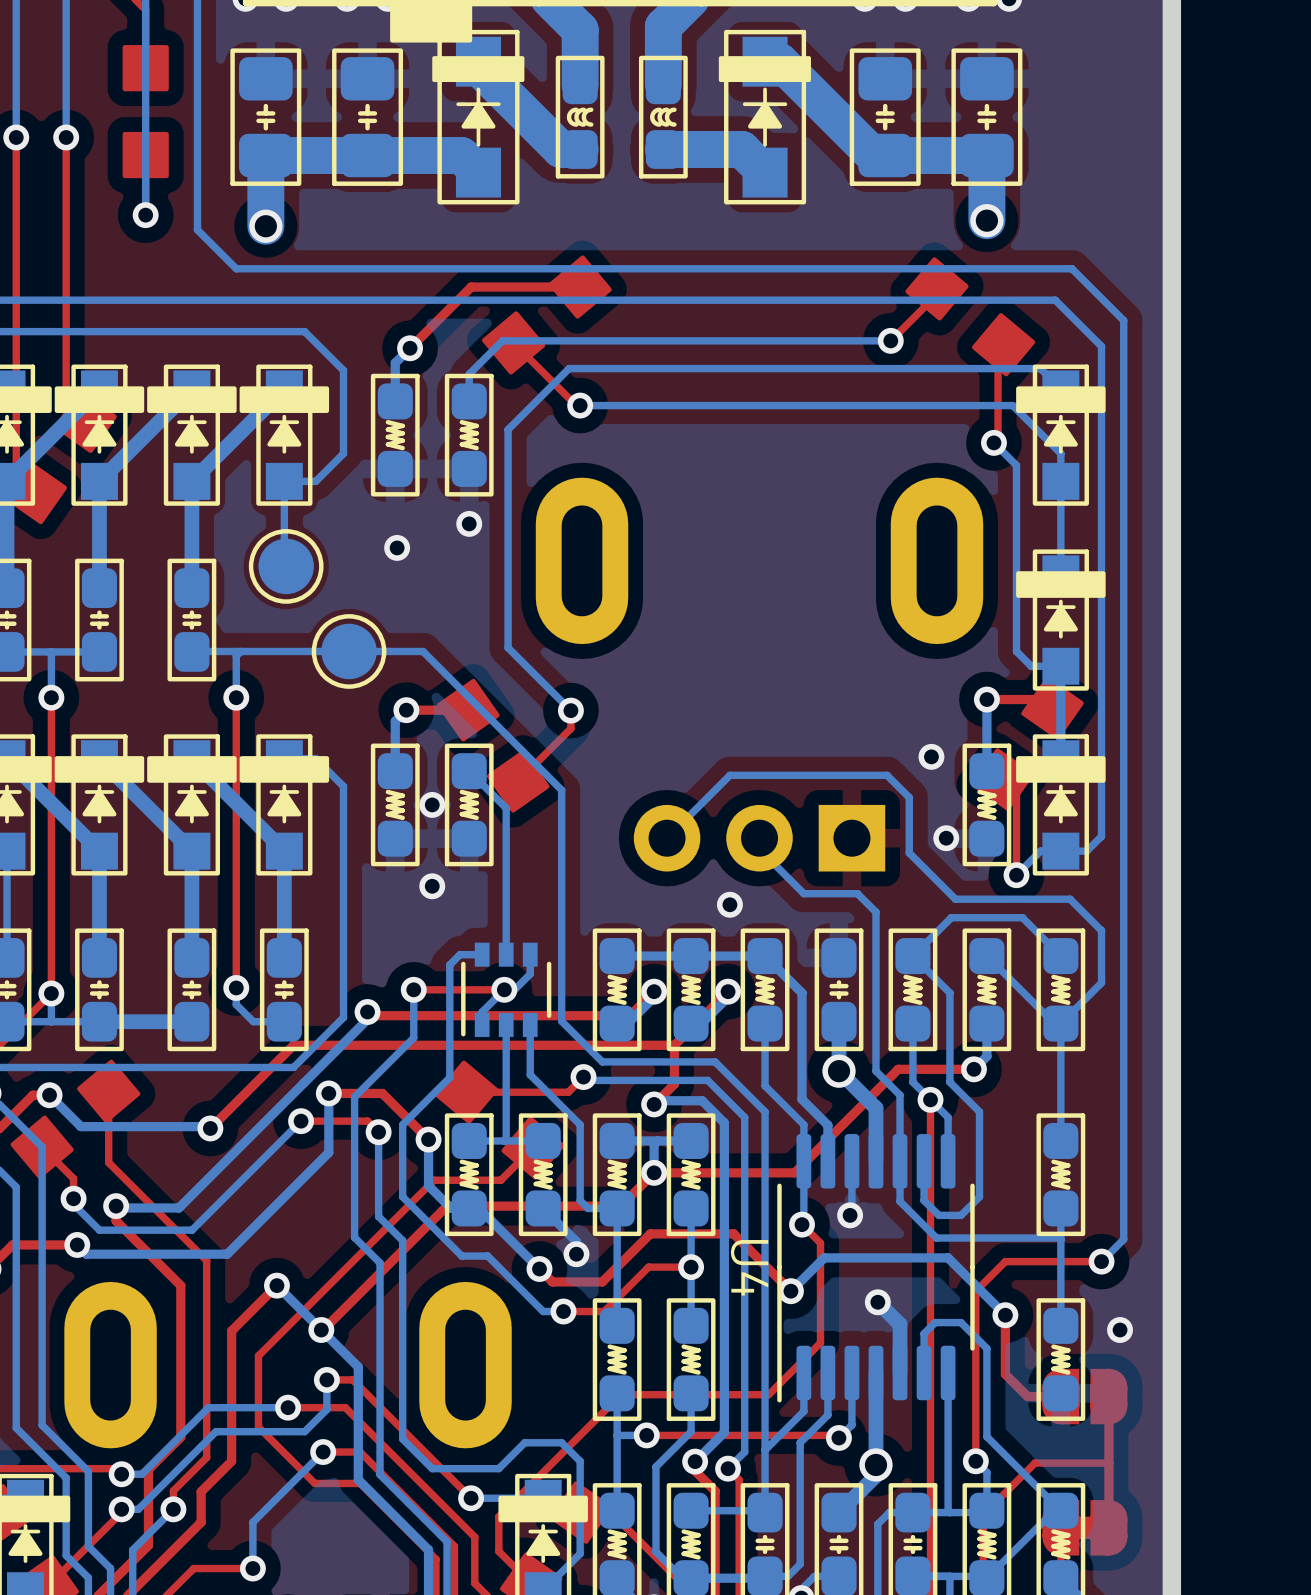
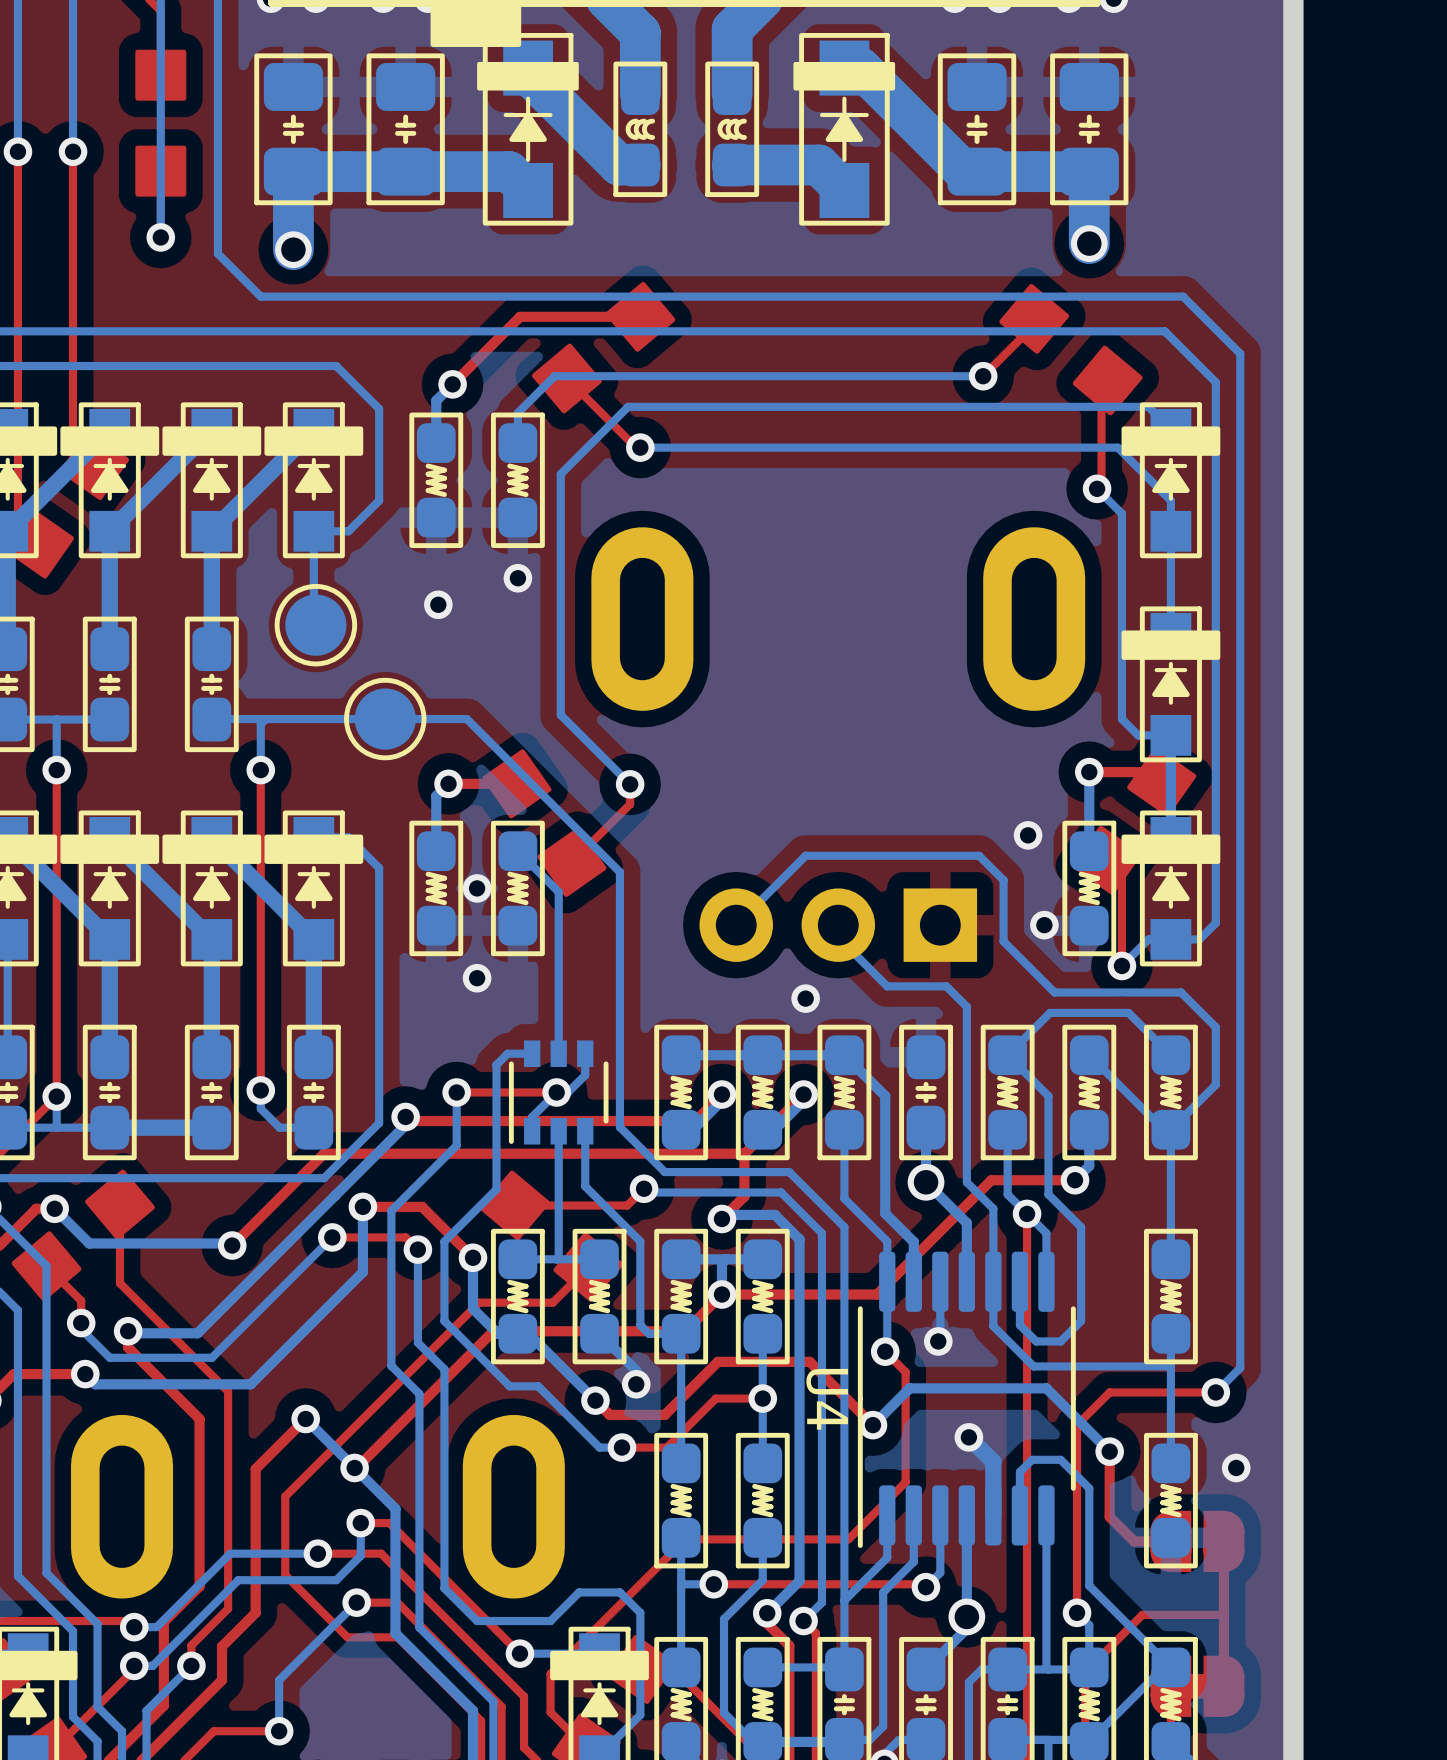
bottom track width: thick (839, 1021) (839, 1071) (875, 1108) (875, 1161) -> thin (926, 1127) (926, 1182) (966, 1223) (966, 1281)
bottom track width: thick (875, 1372) (875, 1475) (839, 1512) -> thin (966, 1515) (966, 1628) (926, 1669)

